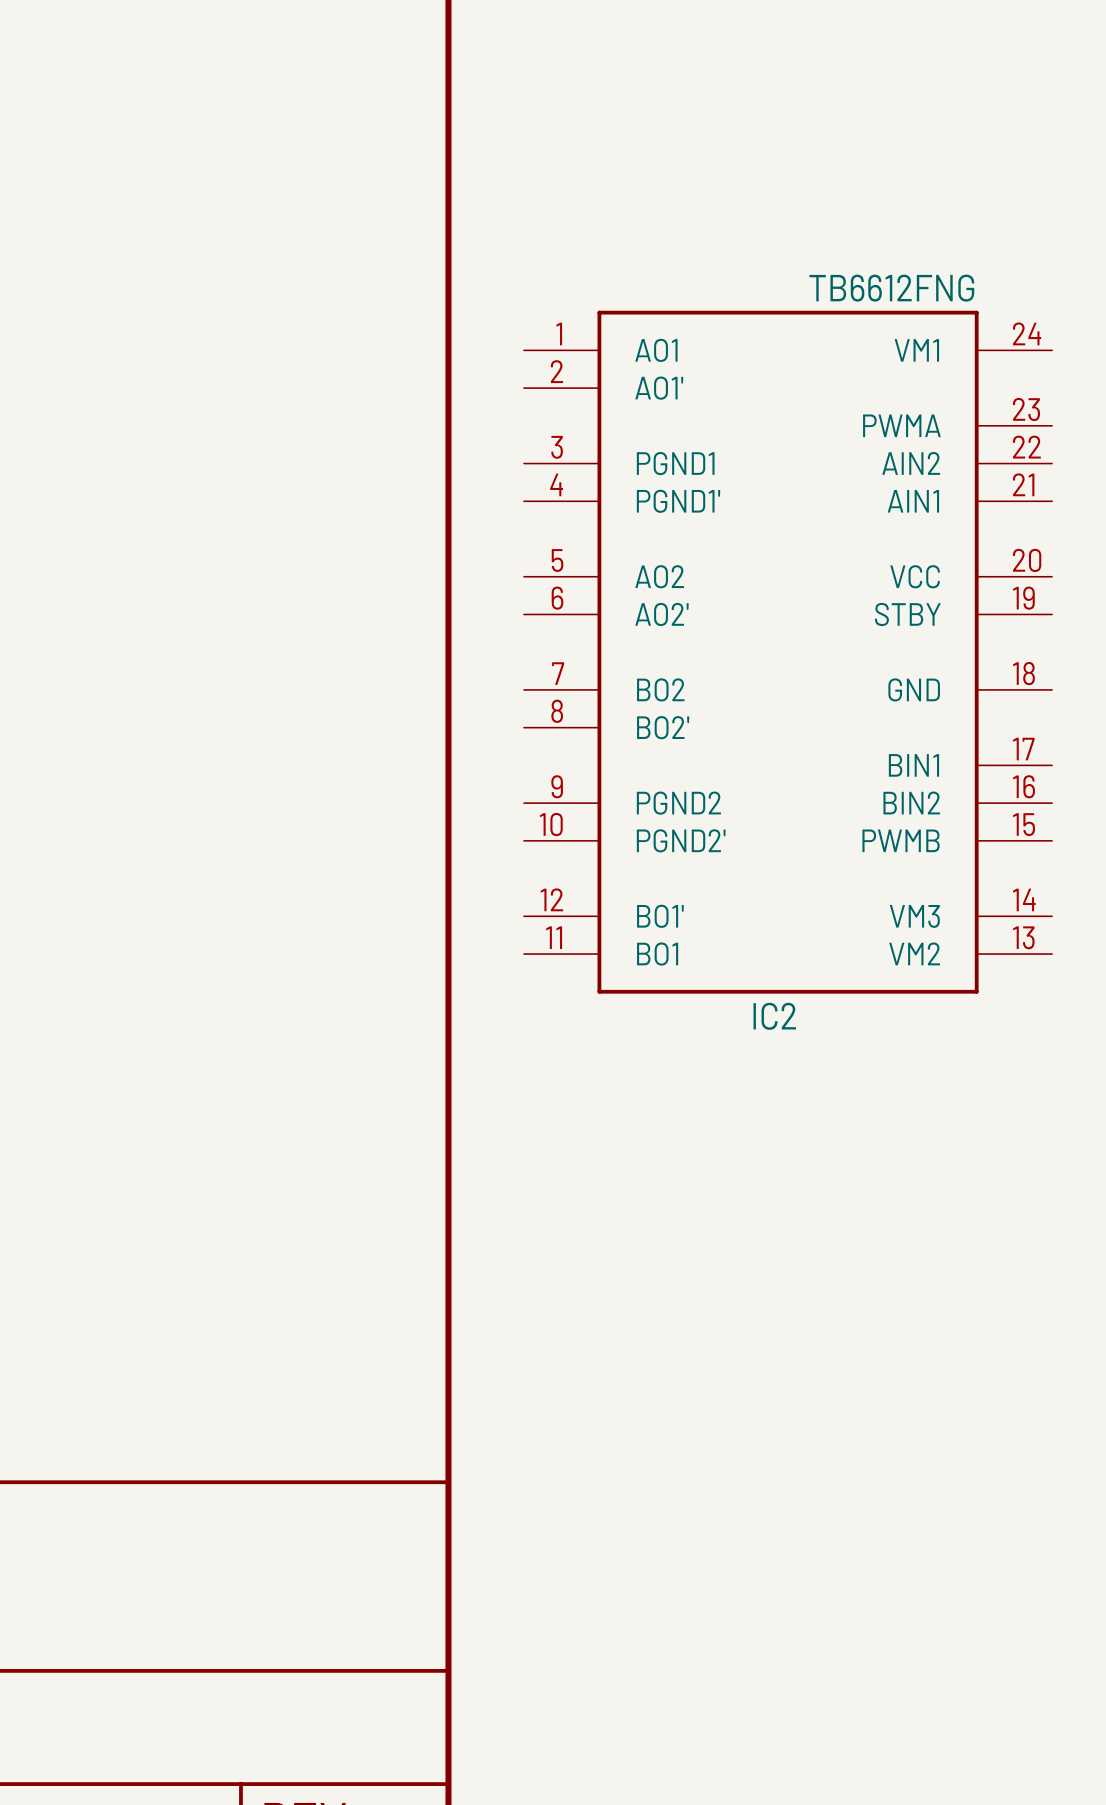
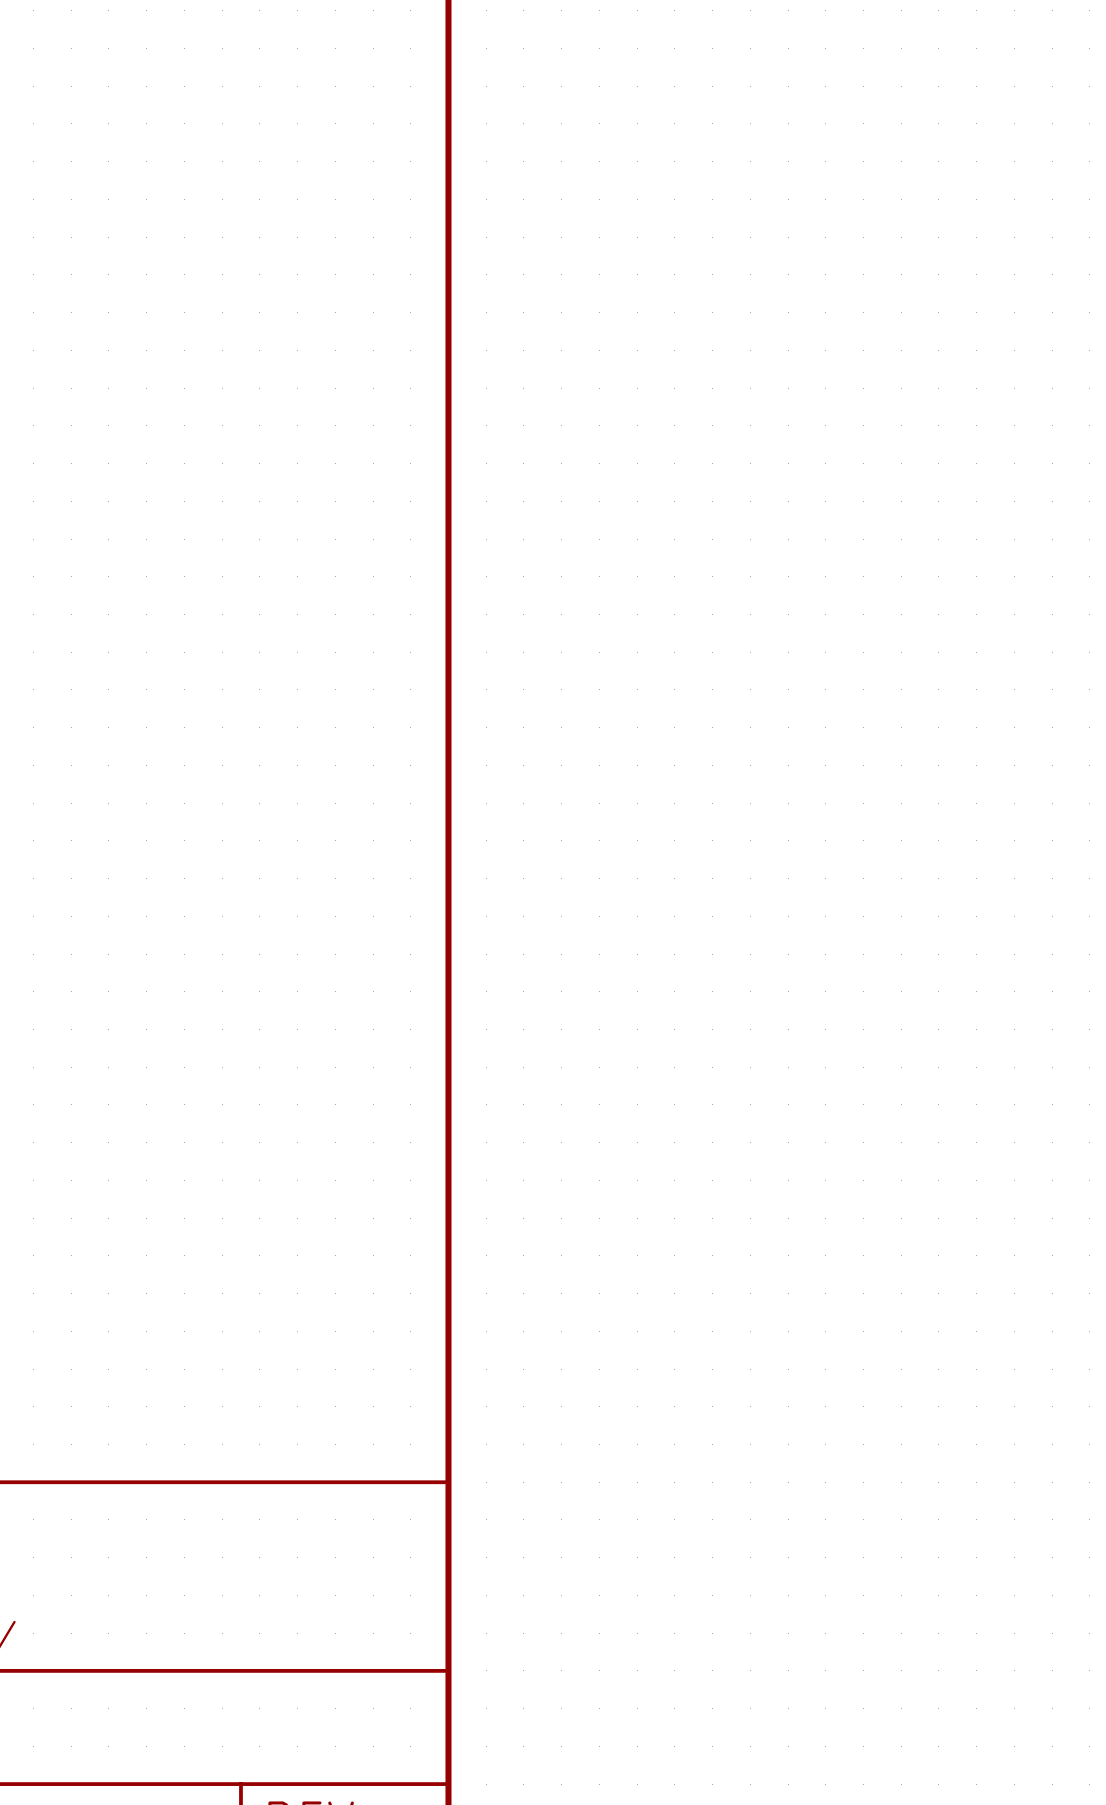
IC2: (788, 652) -> none

